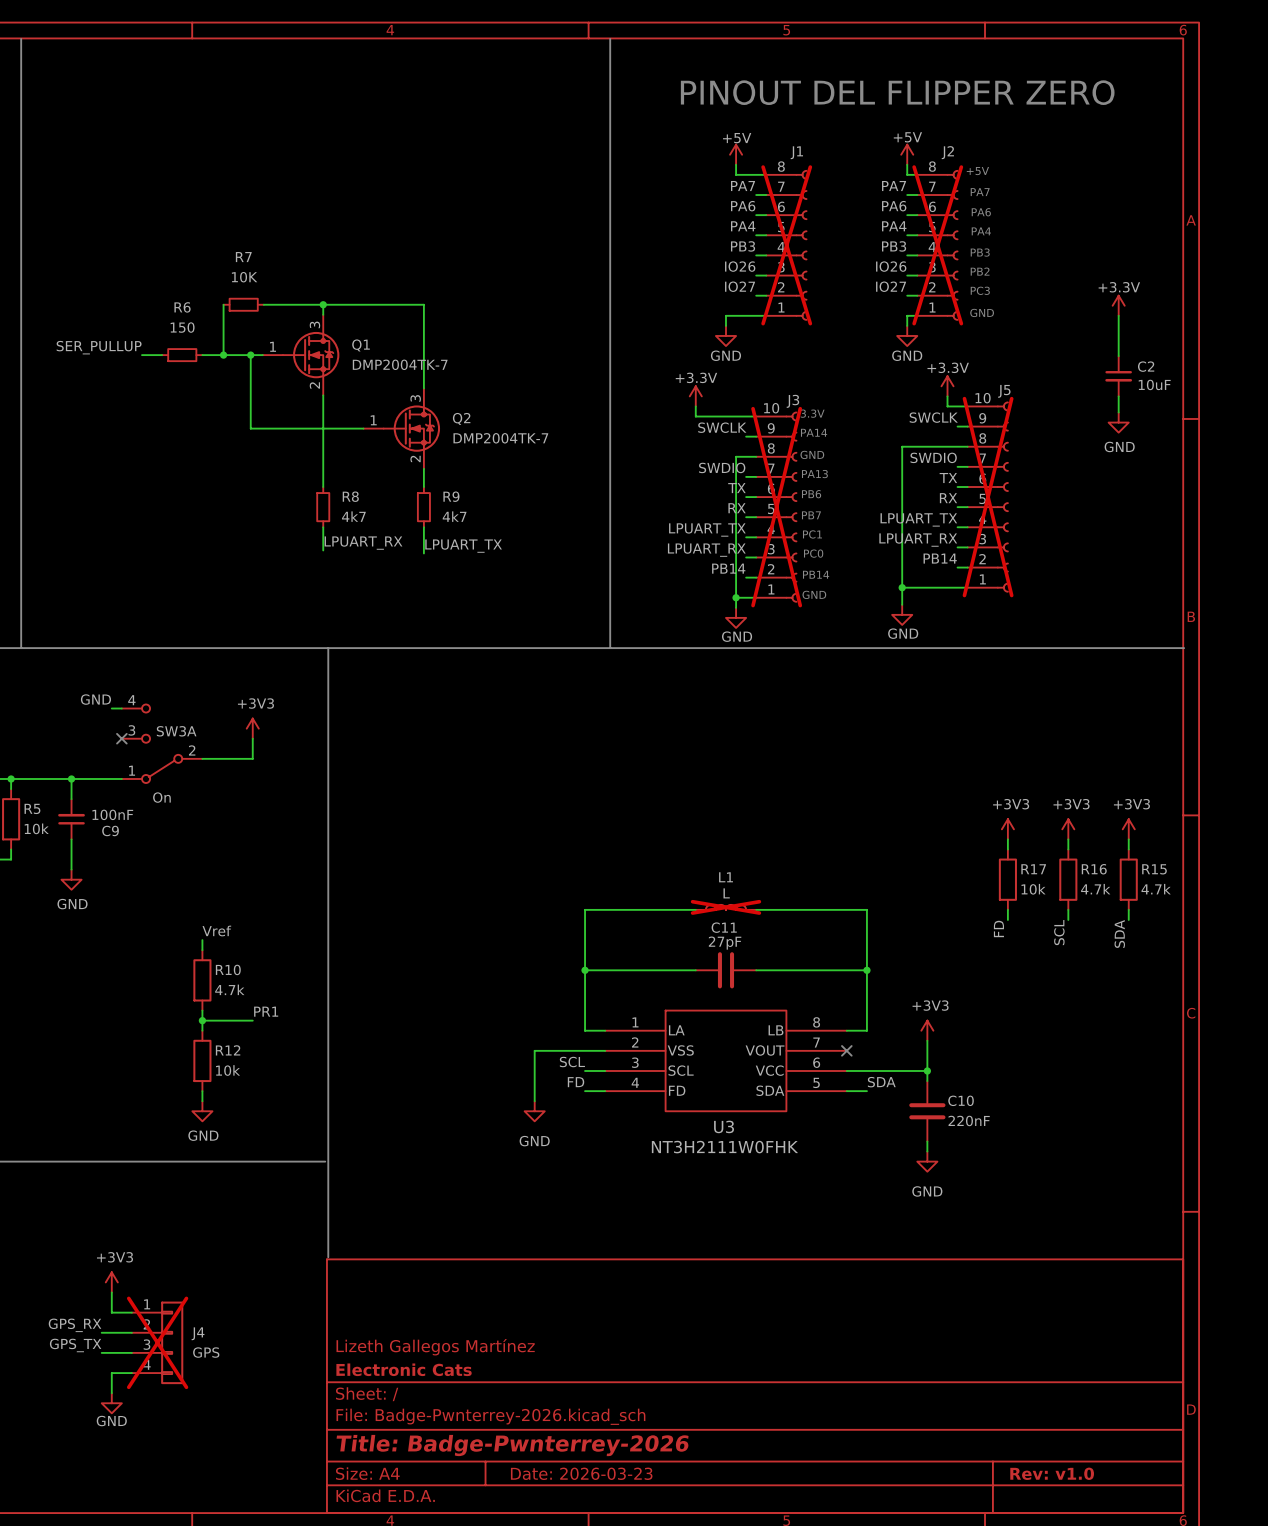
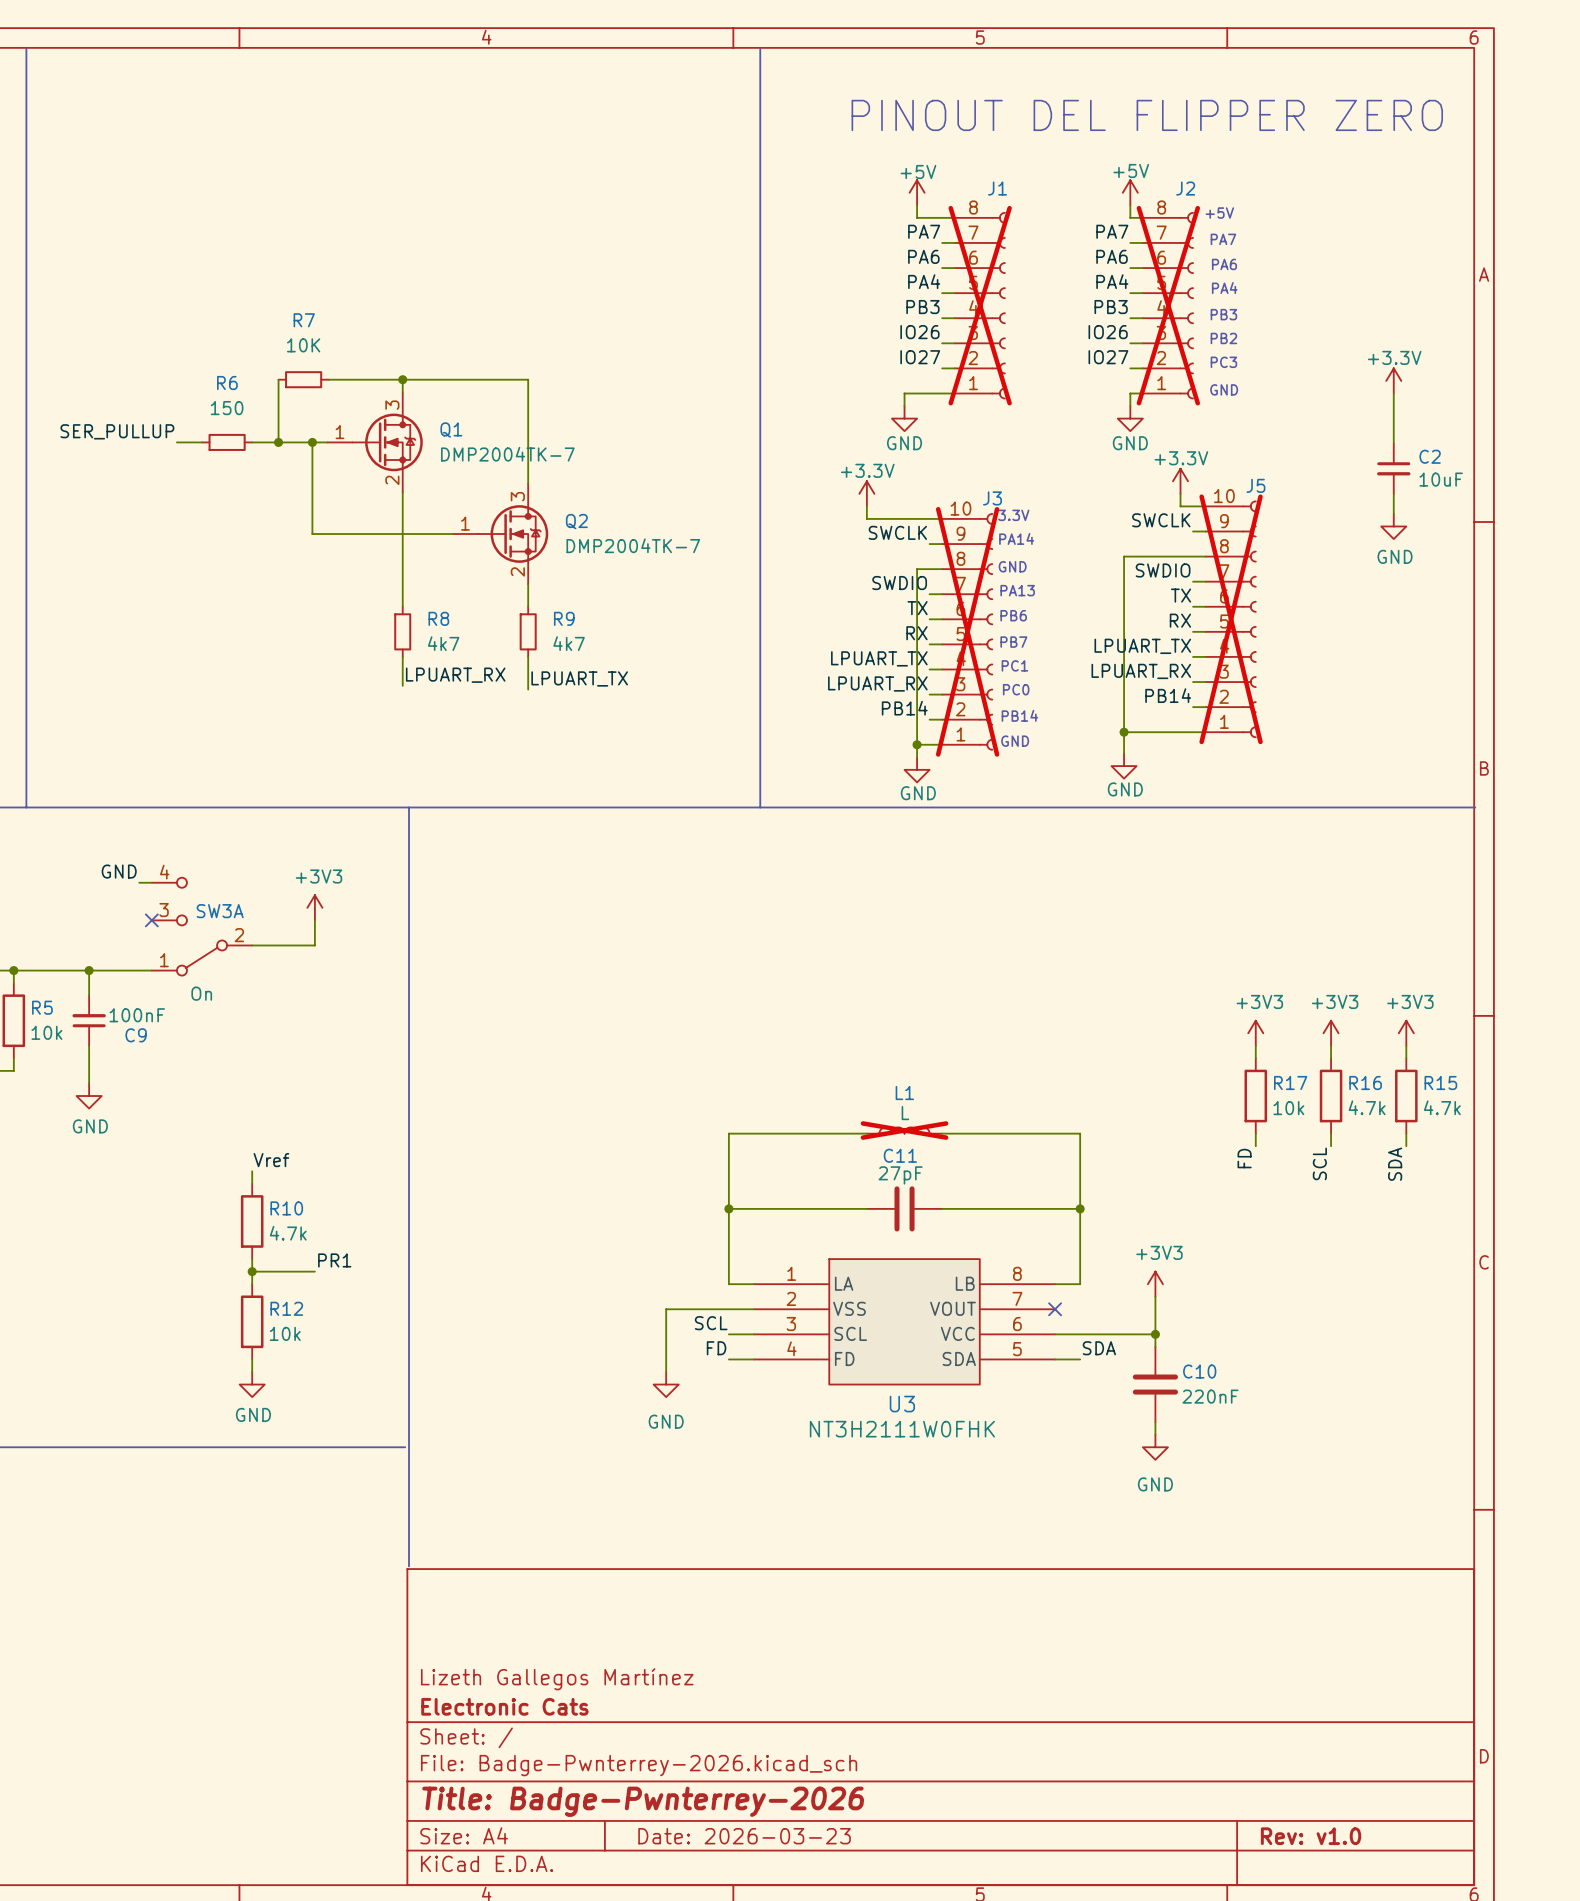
power symbol: +3V3 (111, 1282) -> none
wire: (111, 1292) (111, 1312) (131, 1312) -> none
label: GPS_RX (75, 1325) -> none
wire: (101, 1332) (131, 1332) -> none
J4: GPS (157, 1342) -> none
label: GPS_TX (75, 1345) -> none
wire: (101, 1352) (131, 1352) -> none
wire: (131, 1373) (111, 1373) (111, 1393) -> none
power symbol: GND (111, 1403) -> none

